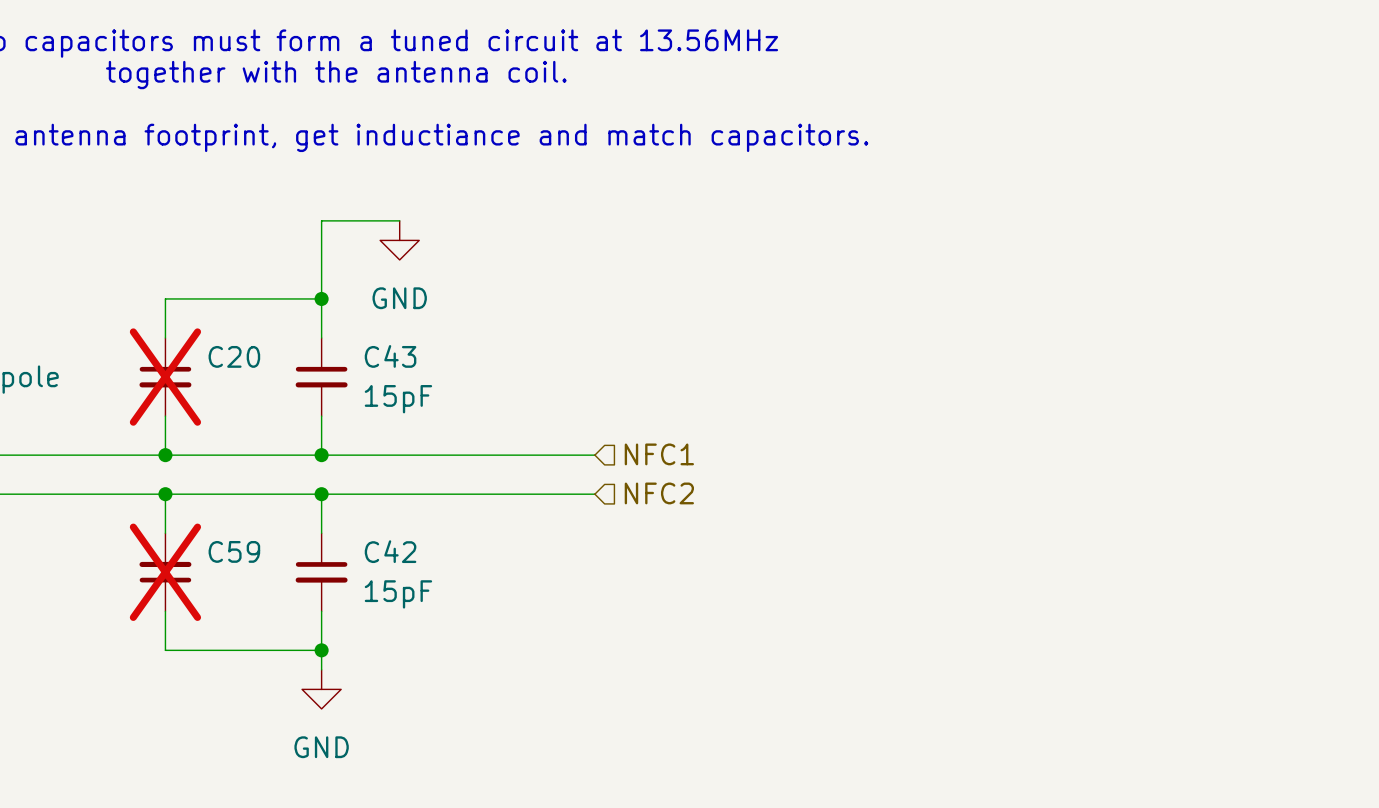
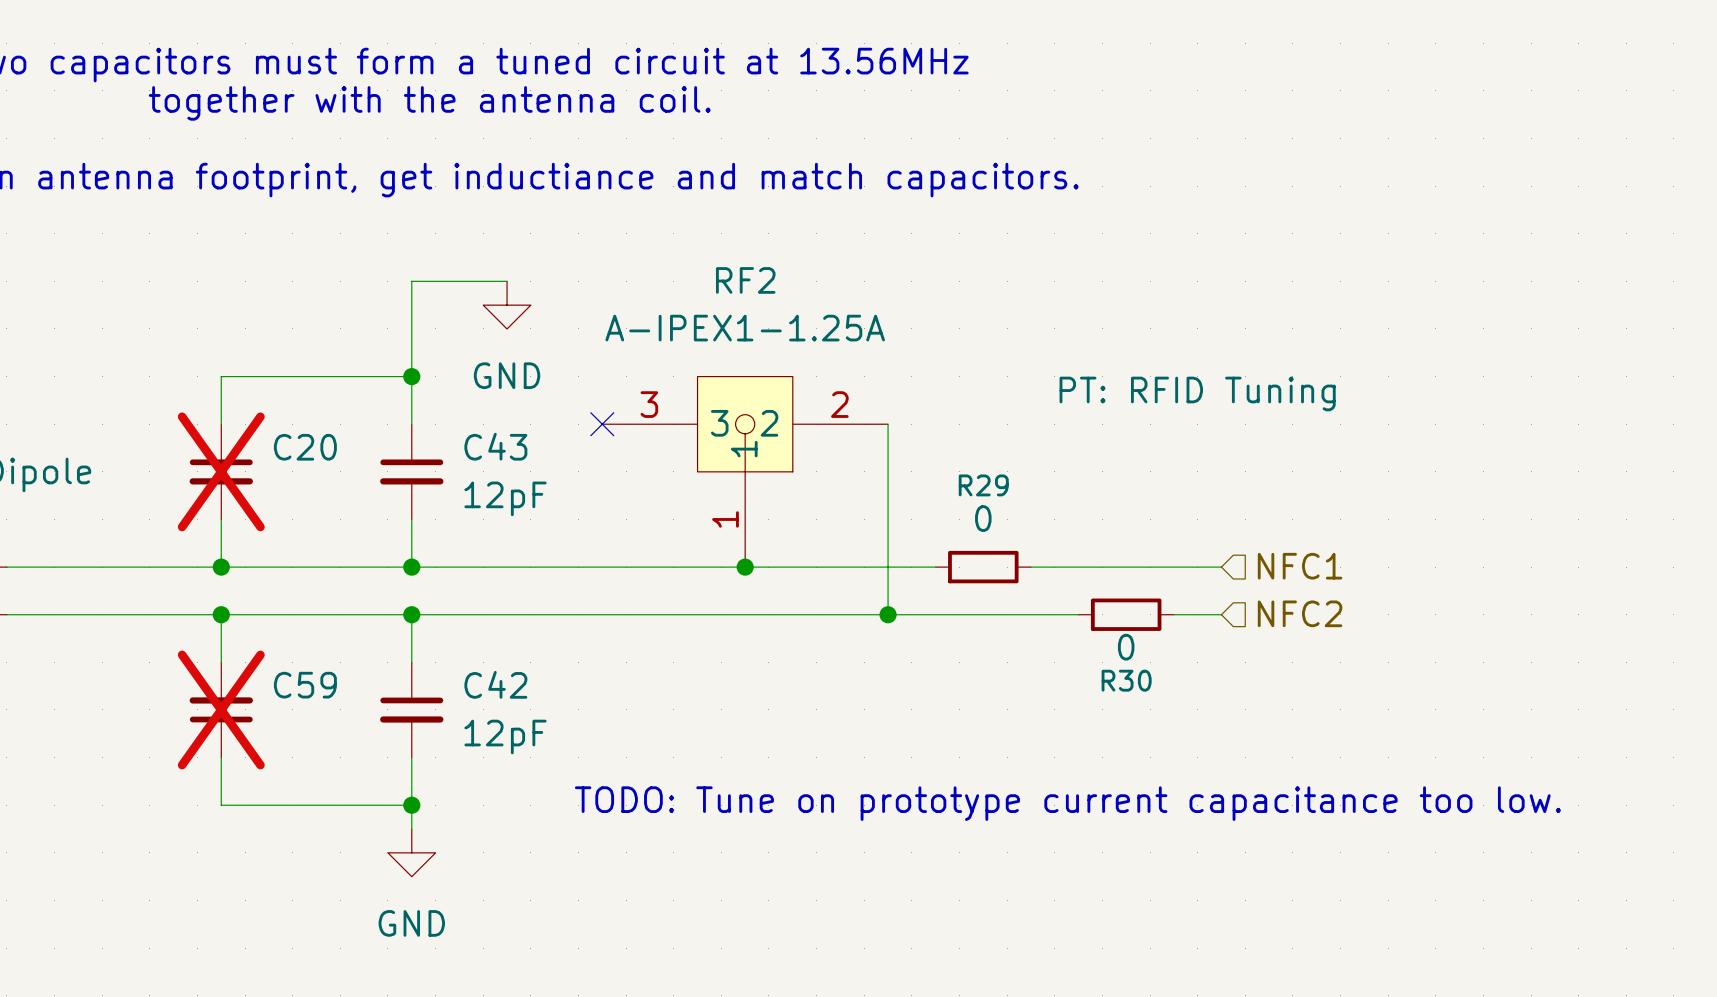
no-connect mark: none -> (602, 424)
wire: none -> (888, 424) (888, 614)
RF2: none -> A-IPEX1-1.25A (745, 471)
C43 value: 15pF (398, 399) -> 12pF (505, 498)
hierarchical label: NFC1 (659, 454) -> none
hierarchical label: none -> NFC1 (1300, 566)
wire: none -> (745, 567) (935, 567)
junction: none -> (745, 567)
R29: none -> 0 (983, 567)
wire: none -> (1030, 567) (1221, 567)
hierarchical label: NFC2 (659, 493) -> none
hierarchical label: none -> NFC2 (1300, 613)
wire: none -> (745, 614) (1078, 614)
junction: none -> (888, 614)
R30: none -> 0 (1126, 614)
wire: none -> (1173, 614) (1221, 614)
C42 value: 15pF (398, 594) -> 12pF (505, 736)
text: none -> TODO: Tune on prototype current capacitance too low. (1067, 803)

